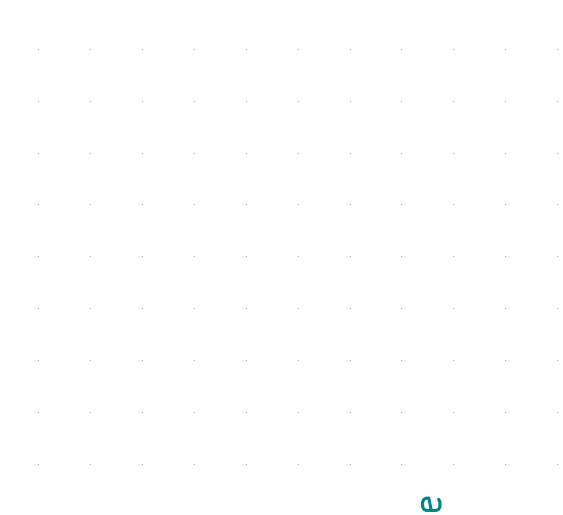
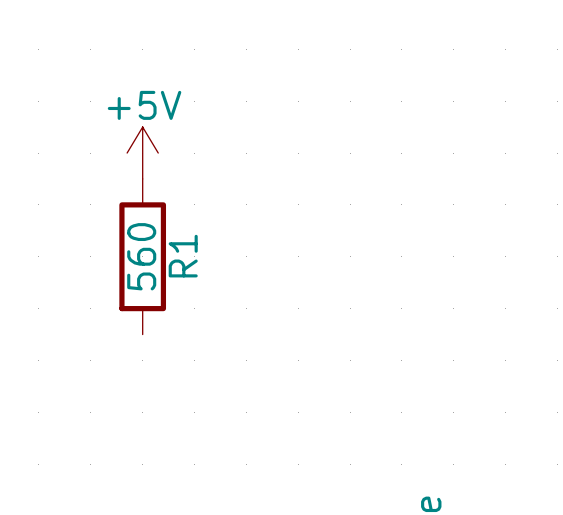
power symbol: none -> +5V (142, 153)
R1: none -> 560 (142, 256)

